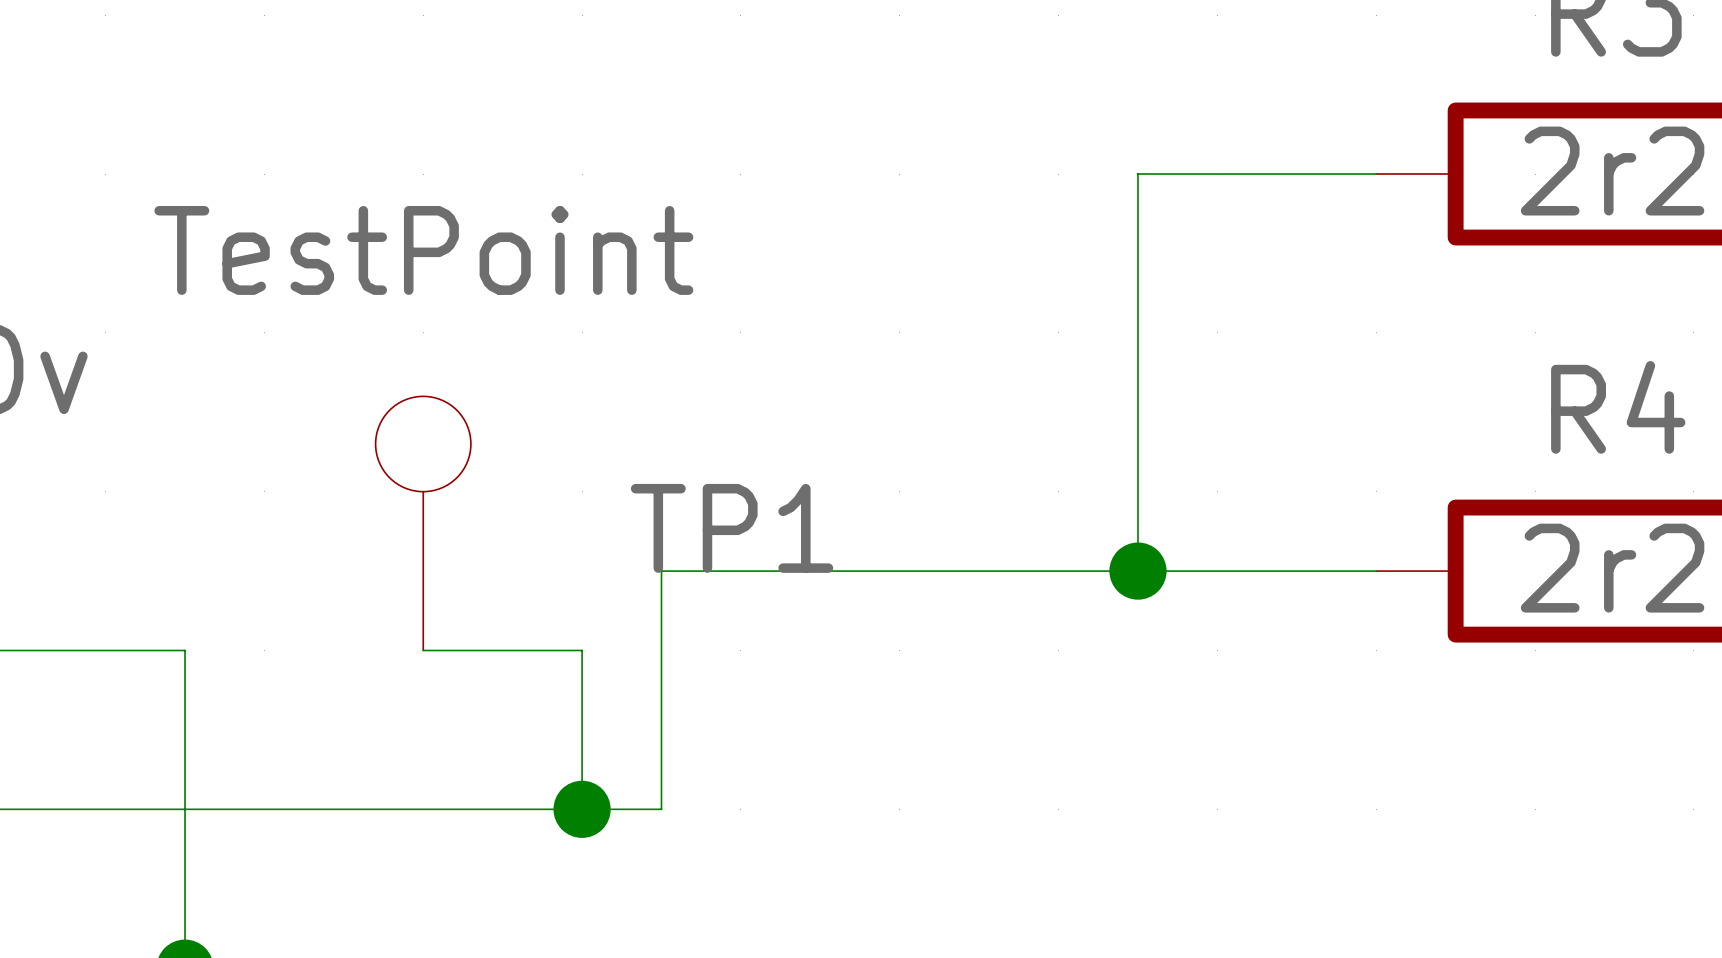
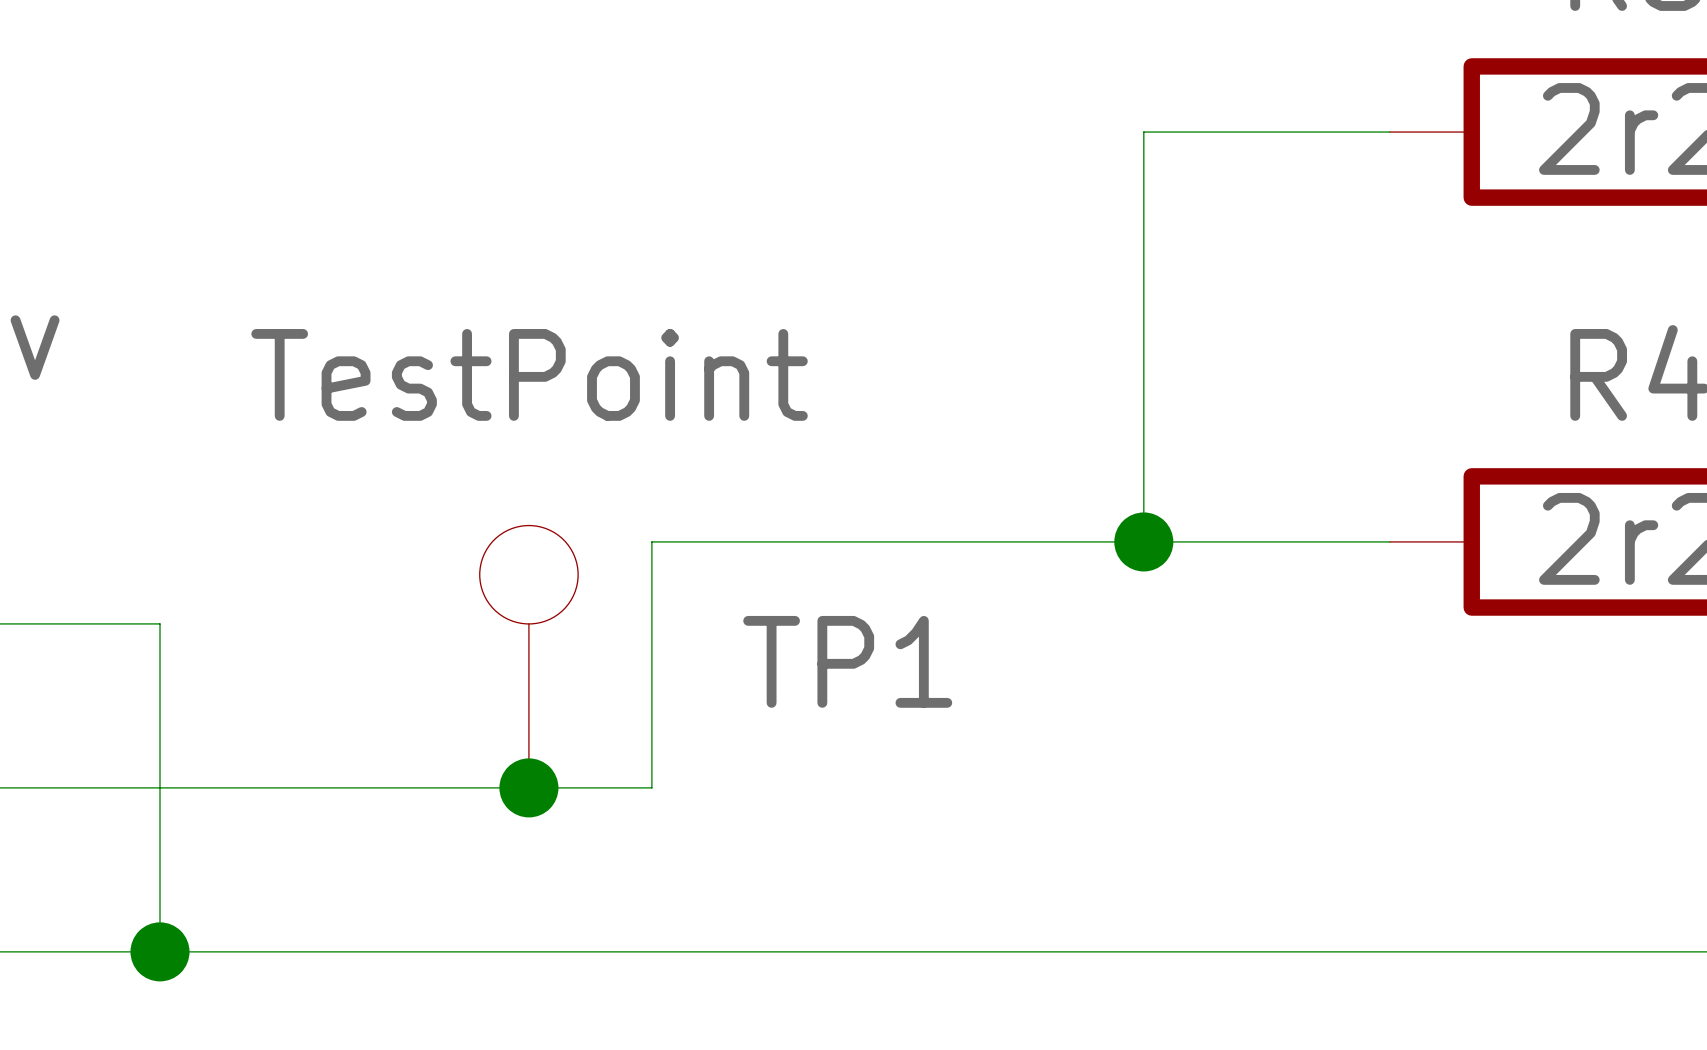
TP1 position: (423, 523) -> (528, 656)
wire: (423, 650) (582, 650) (582, 809) -> none
junction position: (582, 809) -> (528, 787)

